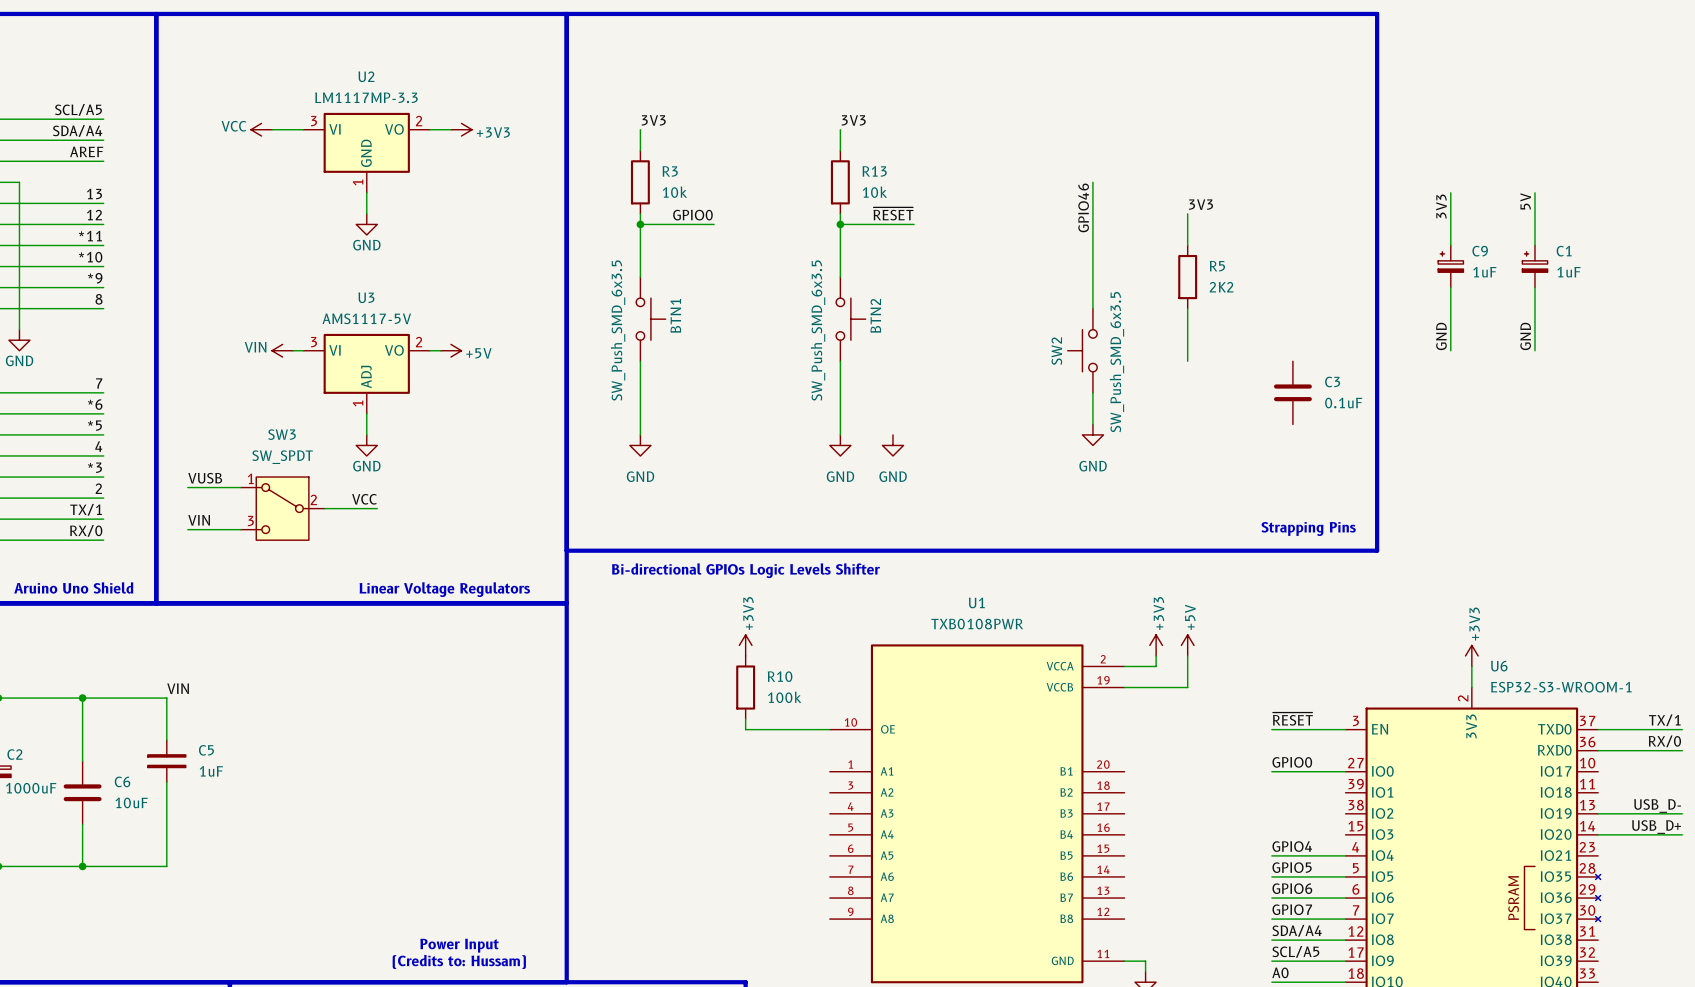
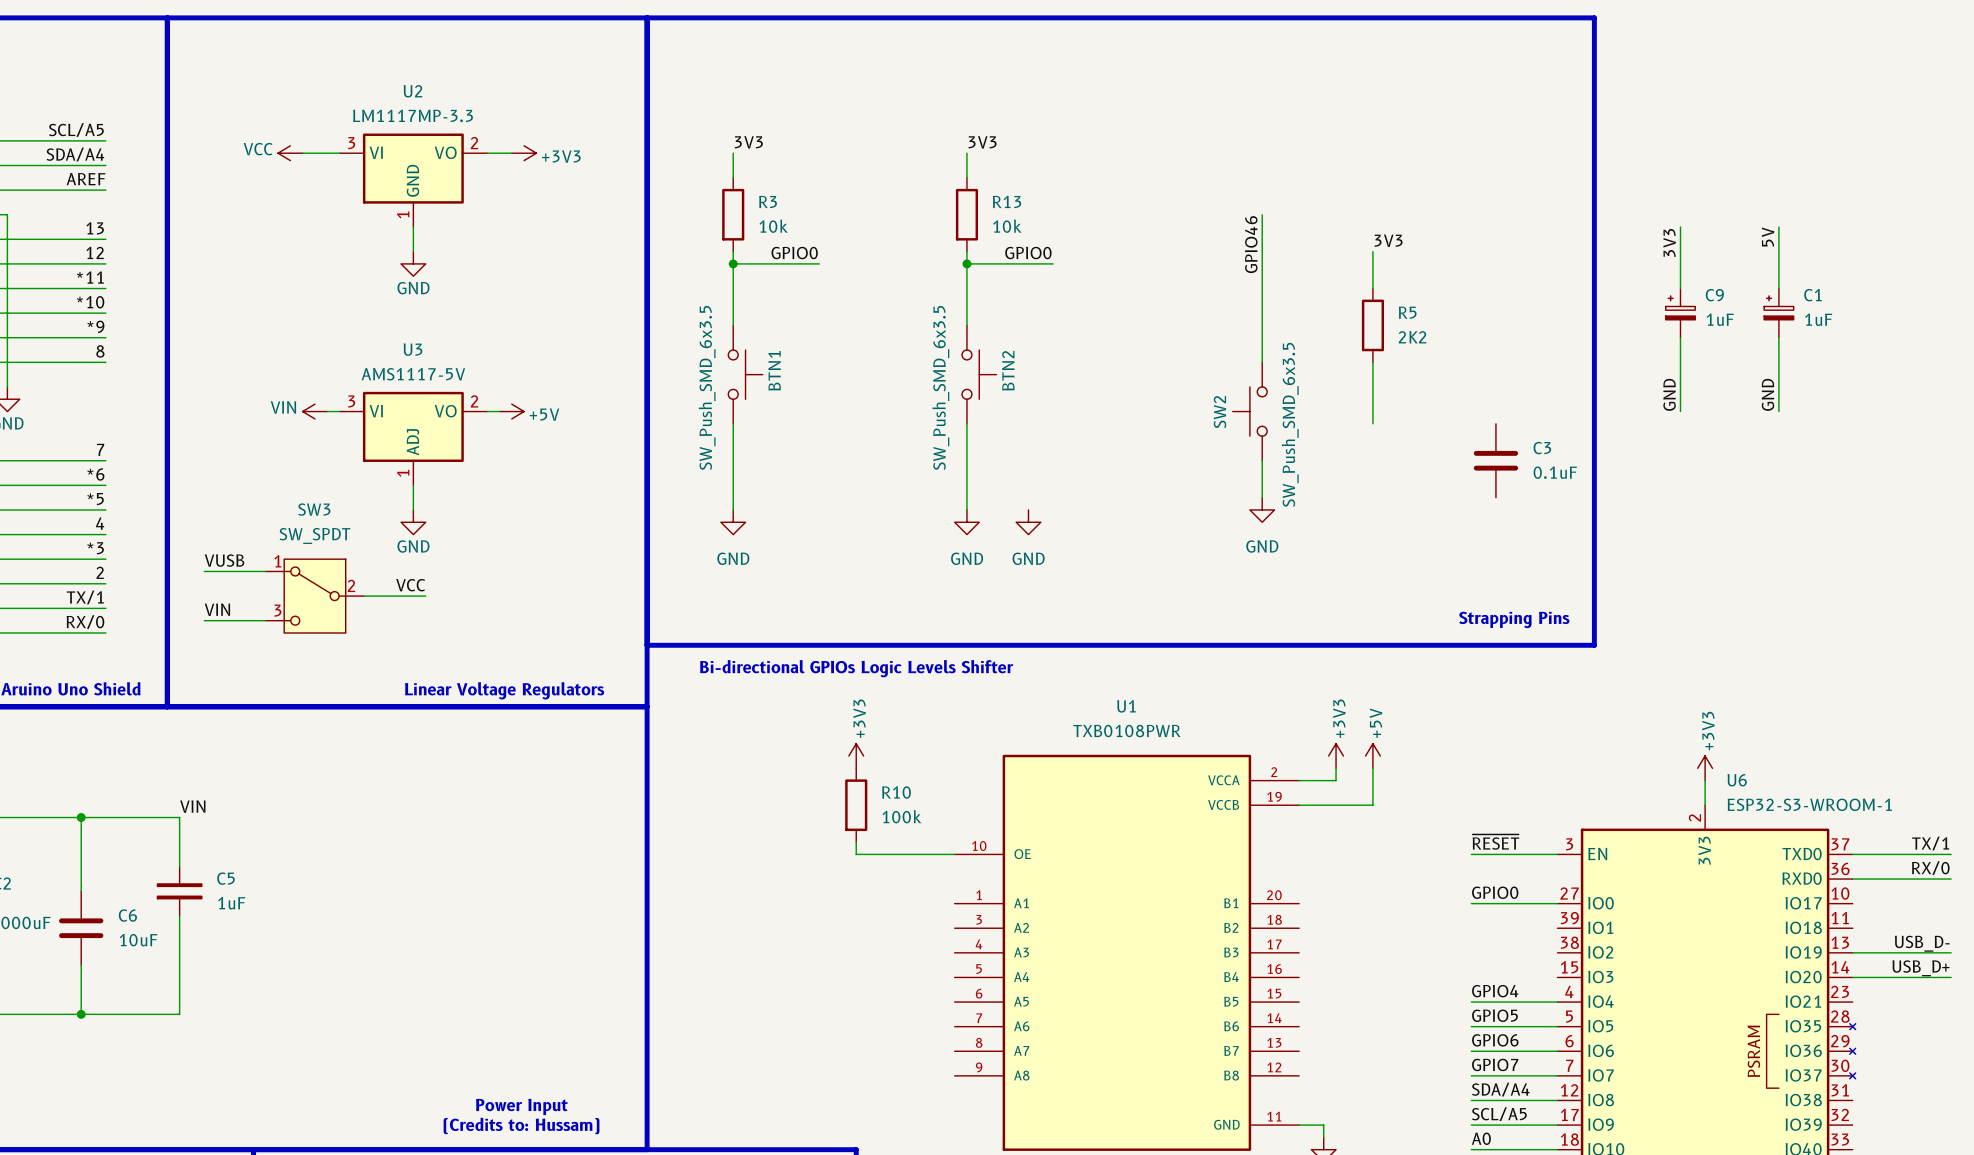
label: ~{RESET} (893, 213) -> GPIO0 (1028, 253)

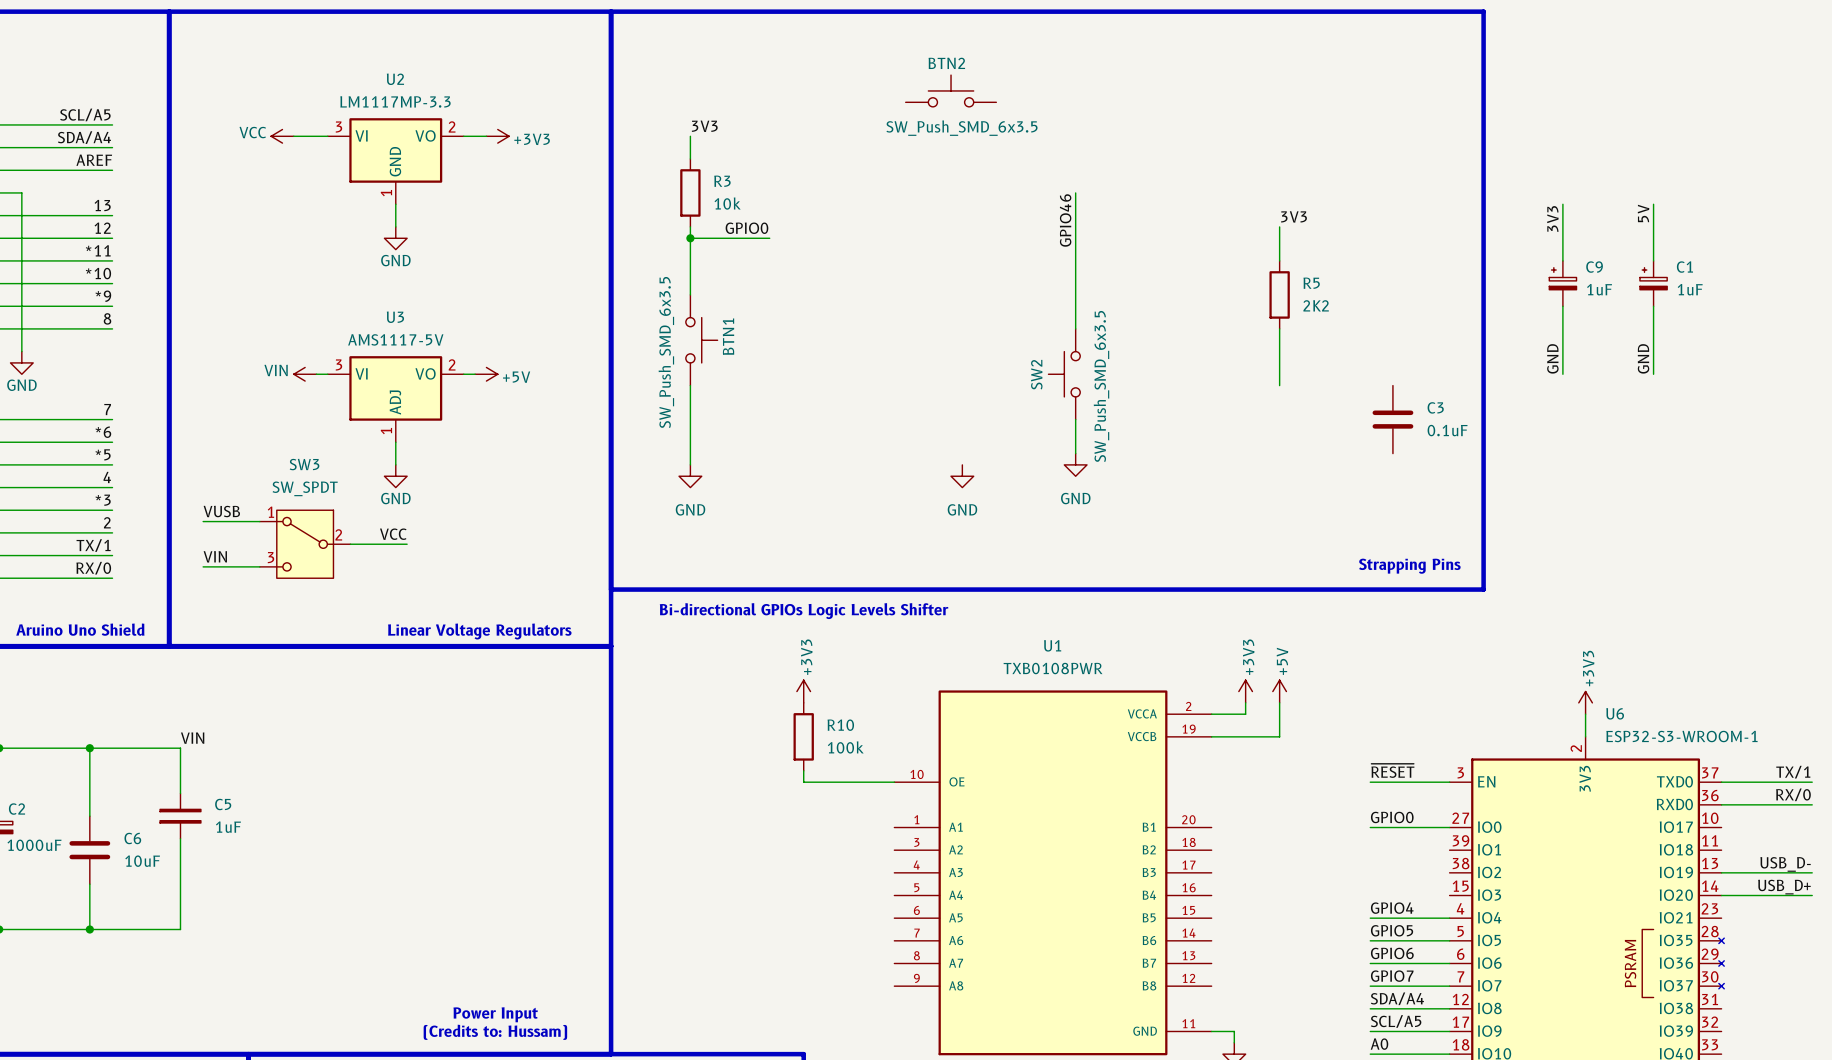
label: 3V3 (982, 142) -> none
wire: (966, 153) (966, 177) -> none
R13: 10k (966, 214) -> none
wire: (1262, 214) (1262, 362) -> (1075, 192) (1075, 328)
label position: GPIO46 (1251, 244) -> GPIO46 (1065, 220)
wire: (966, 251) (966, 325) -> none
label: GPIO0 (1028, 253) -> none
wire: (966, 263) (1053, 263) -> none
junction: (966, 263) -> none
BTN2 rotation: 0° (979, 374) -> 90° counterclockwise (951, 90)
BTN2 position: (979, 374) -> (951, 90)
SW2 position: (1249, 411) -> (1064, 374)
wire: (966, 423) (966, 509) -> none
wire: (1262, 460) (1262, 497) -> (1075, 419) (1075, 453)
power symbol: none -> GND (1075, 464)
power symbol: GND (1262, 509) -> none
power symbol: GND (966, 522) -> none

